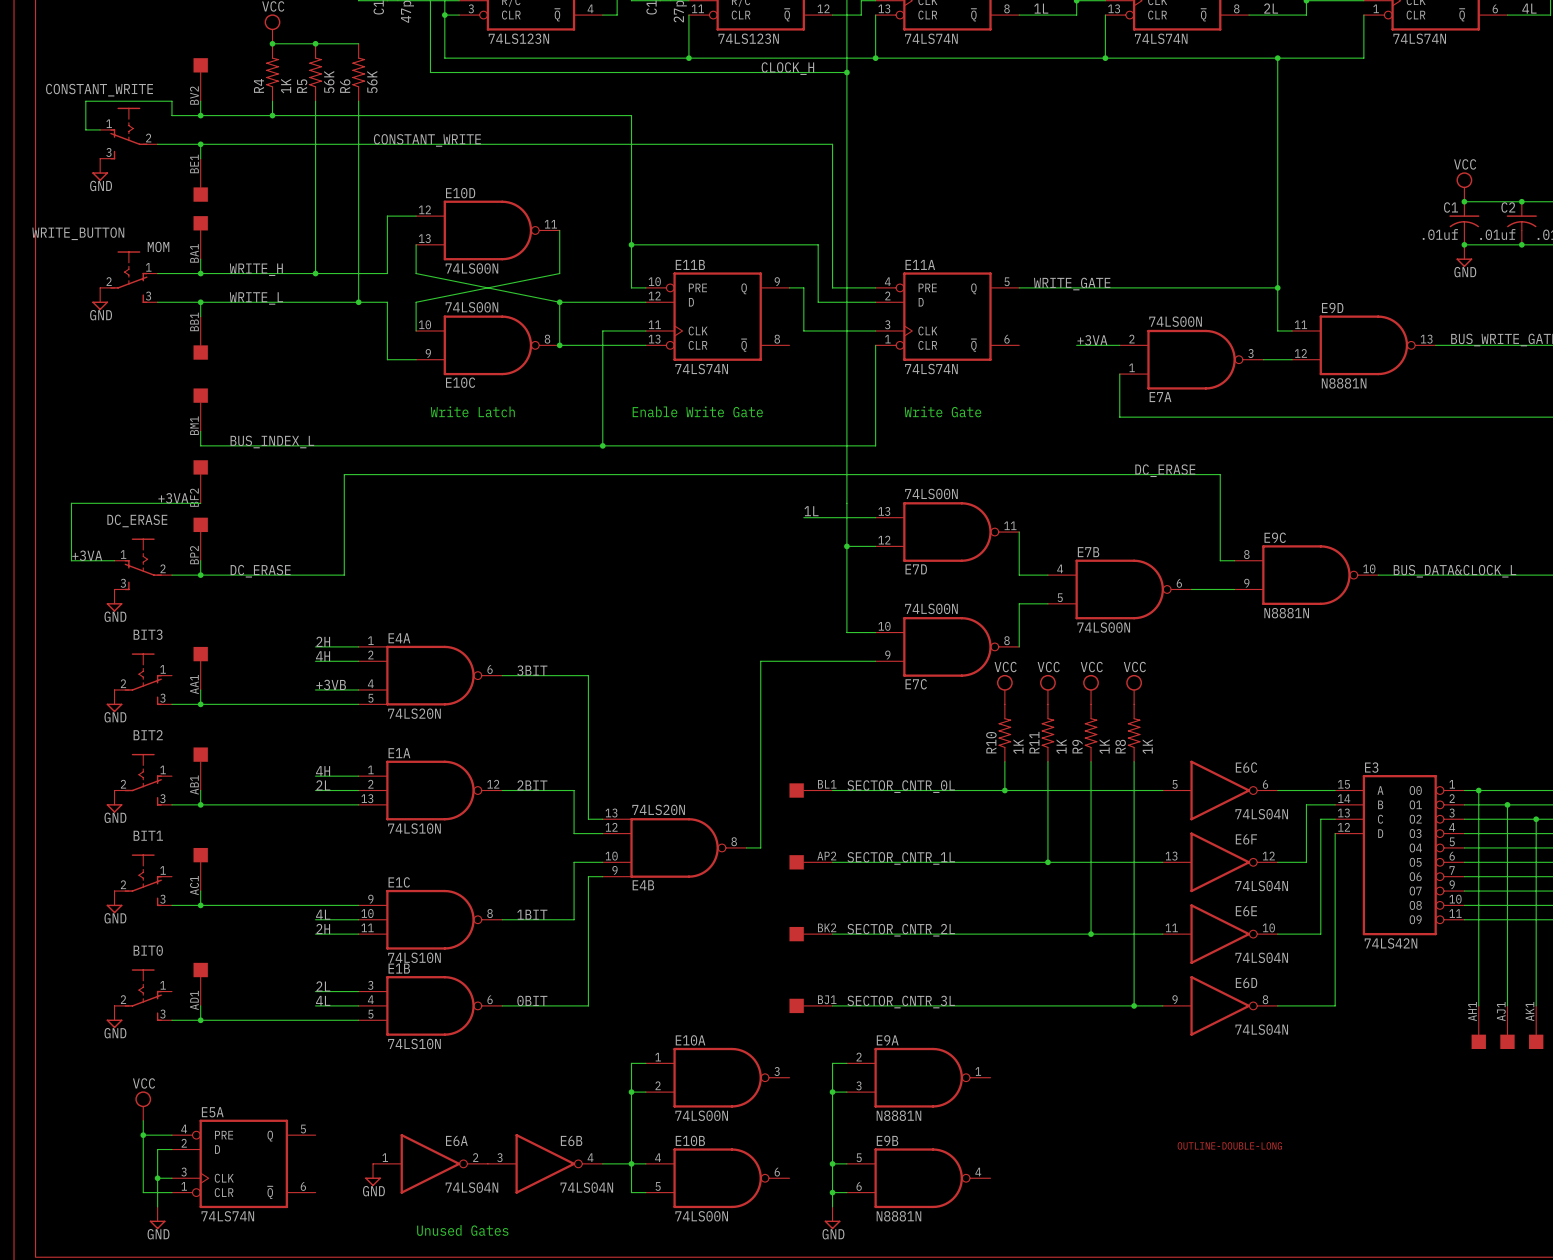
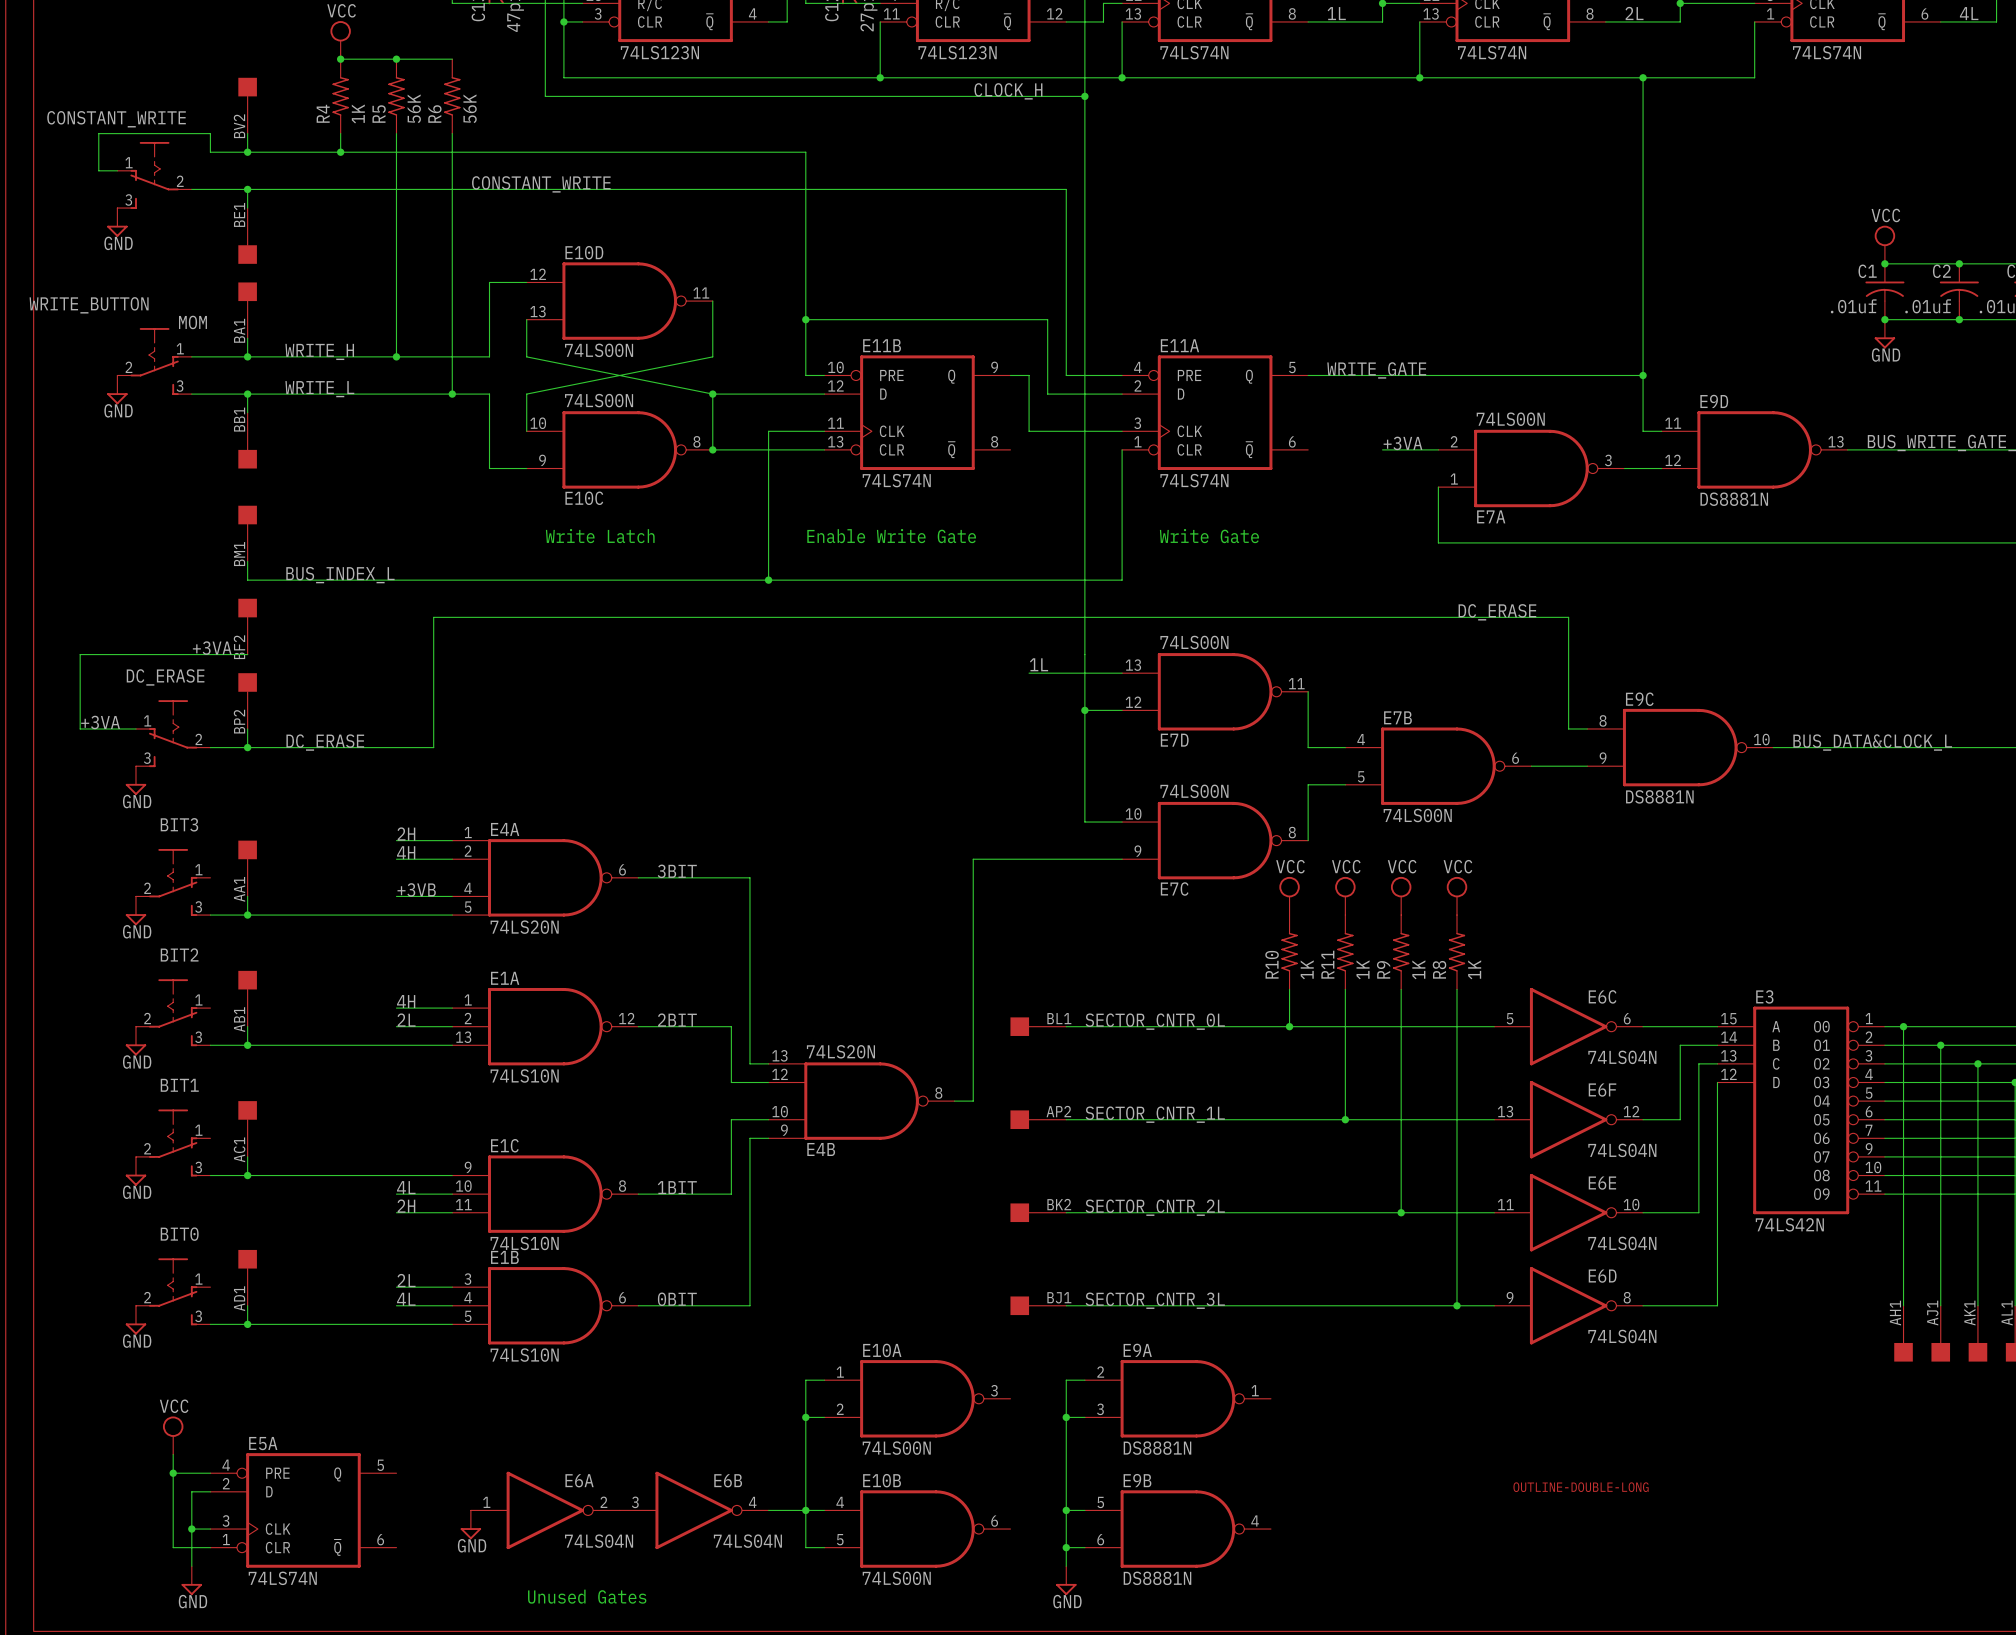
E9D value: N8881N (1344, 383) -> DS8881N (1734, 499)
E9C value: N8881N (1286, 613) -> DS8881N (1659, 796)
E9A value: N8881N (898, 1115) -> DS8881N (1157, 1448)
E9B value: N8881N (898, 1216) -> DS8881N (1157, 1578)

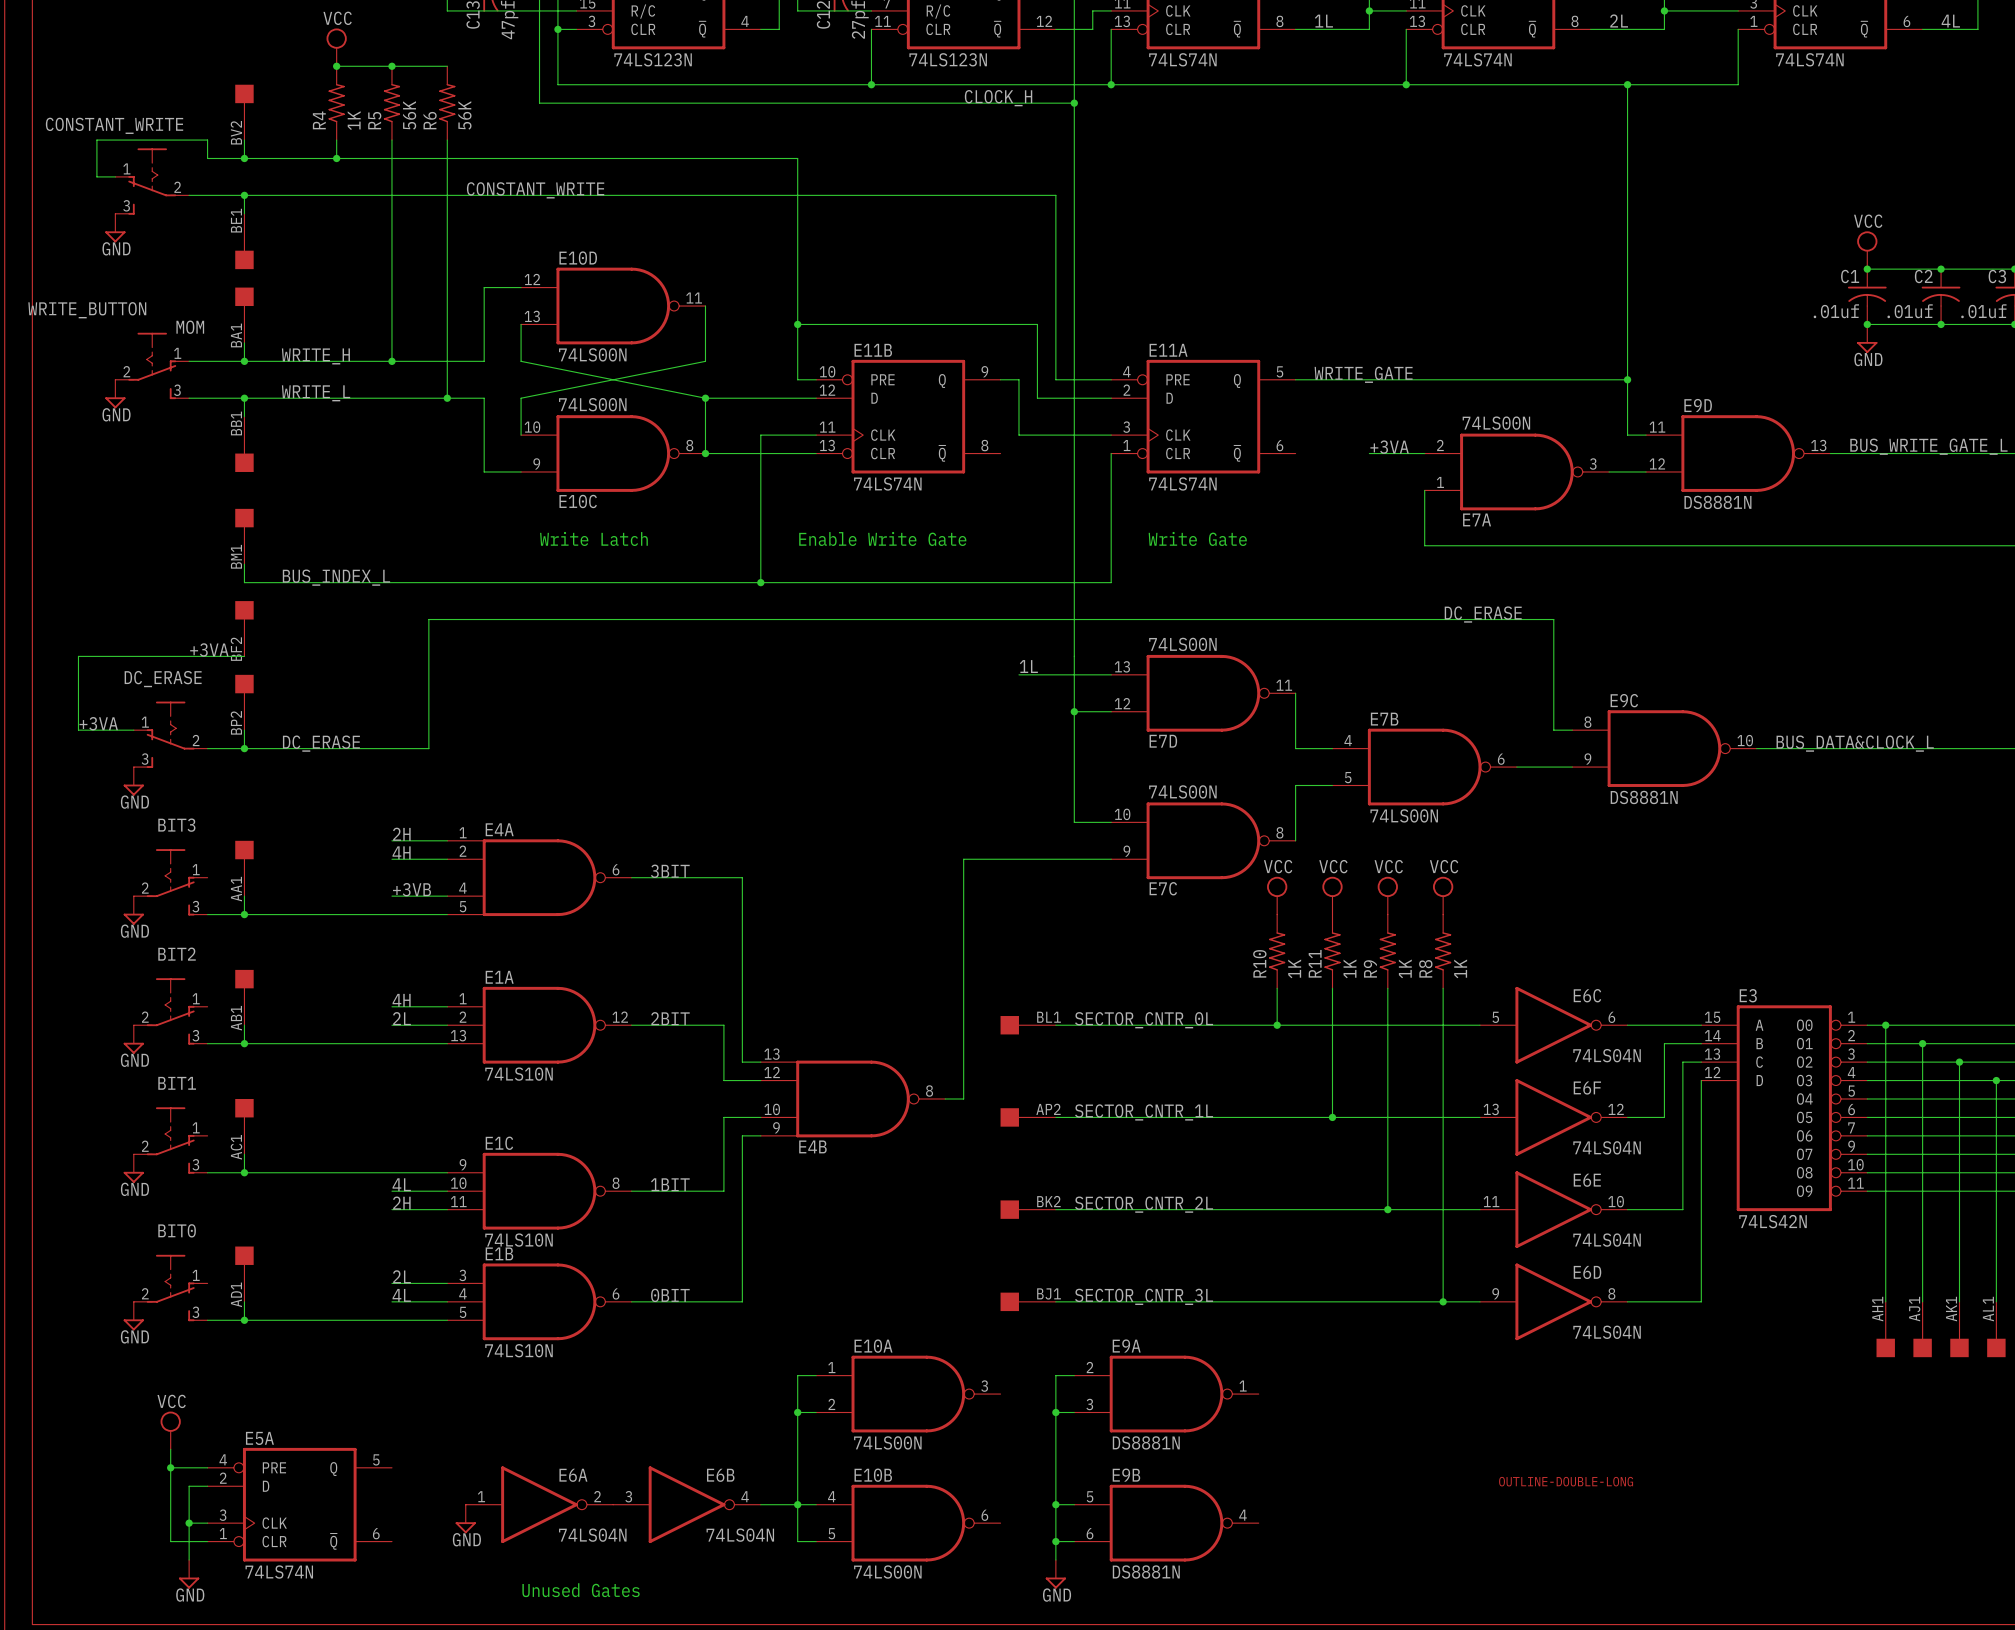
E4A value: 74LS20N (524, 927) -> none
E4B value: 74LS20N (840, 1051) -> none

